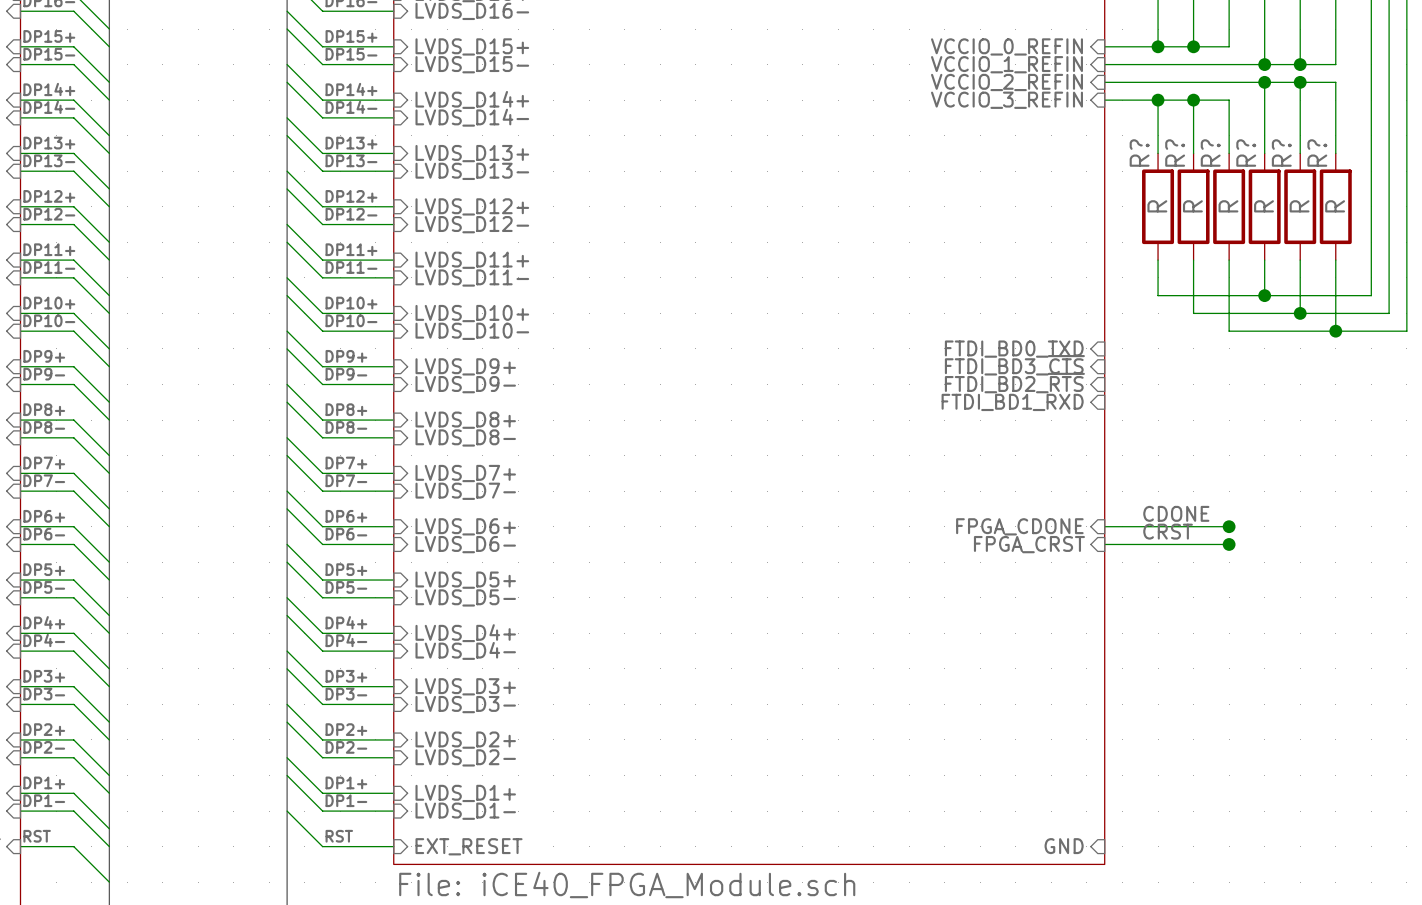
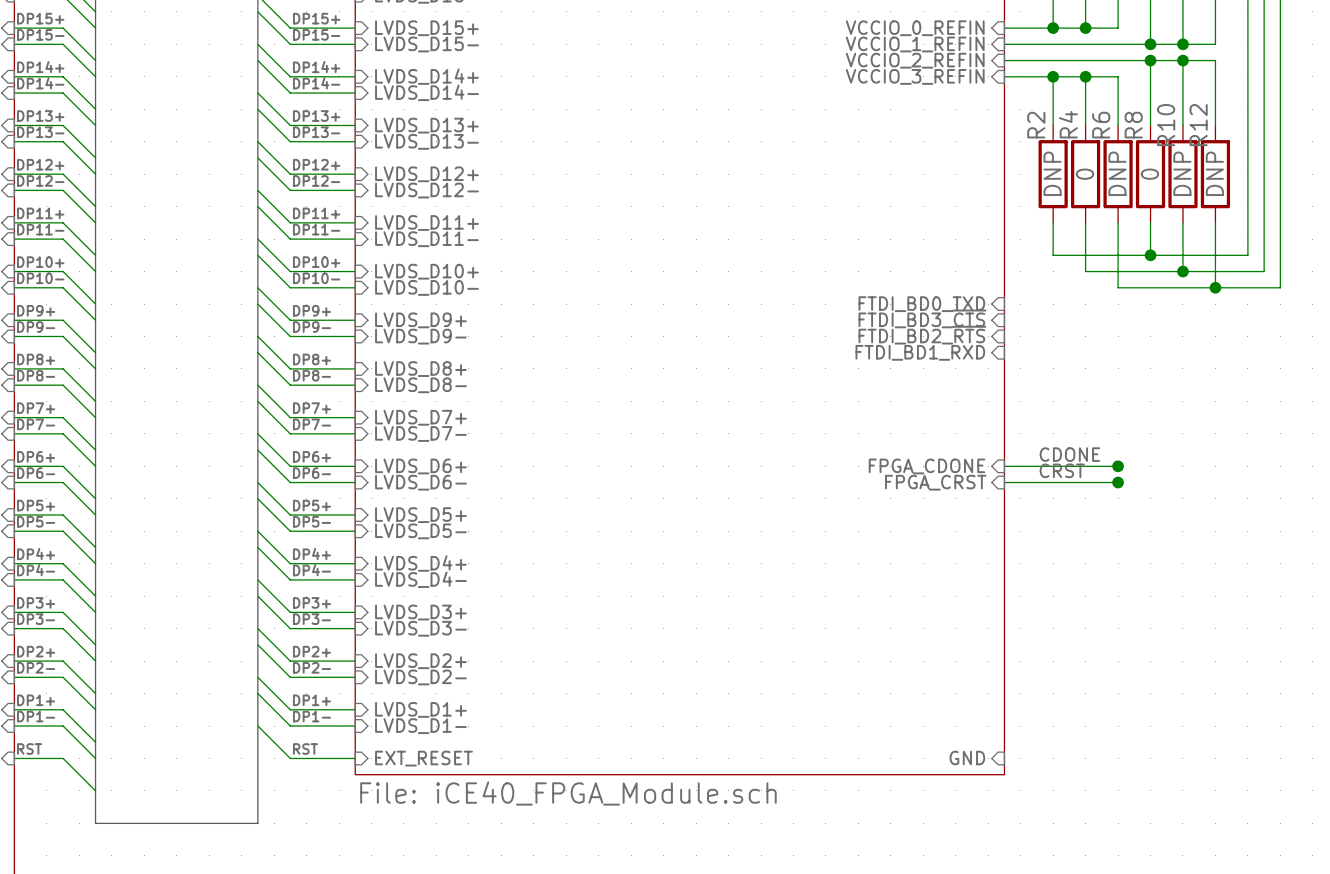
R? name: R? (1139, 153) -> R2 (1036, 125)
R? name: R? (1175, 153) -> R4 (1068, 124)
R? name: R? (1210, 153) -> R6 (1101, 125)
R? name: R? (1246, 153) -> R8 (1133, 125)
R? name: R? (1281, 153) -> R10 (1166, 125)
R? name: R? (1317, 153) -> R12 (1198, 125)
R? value: R (1157, 206) -> DNP (1052, 173)
R? value: R (1192, 206) -> 0 (1085, 174)
R? value: R (1228, 206) -> DNP (1117, 173)
R? value: R (1264, 206) -> 0 (1149, 174)
R? value: R (1299, 206) -> DNP (1182, 173)
R? value: R (1335, 206) -> DNP (1214, 173)

